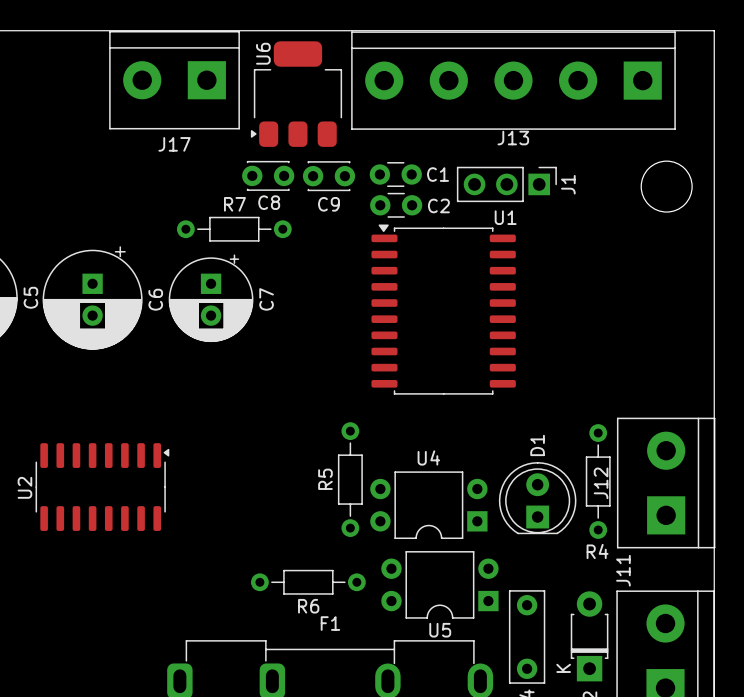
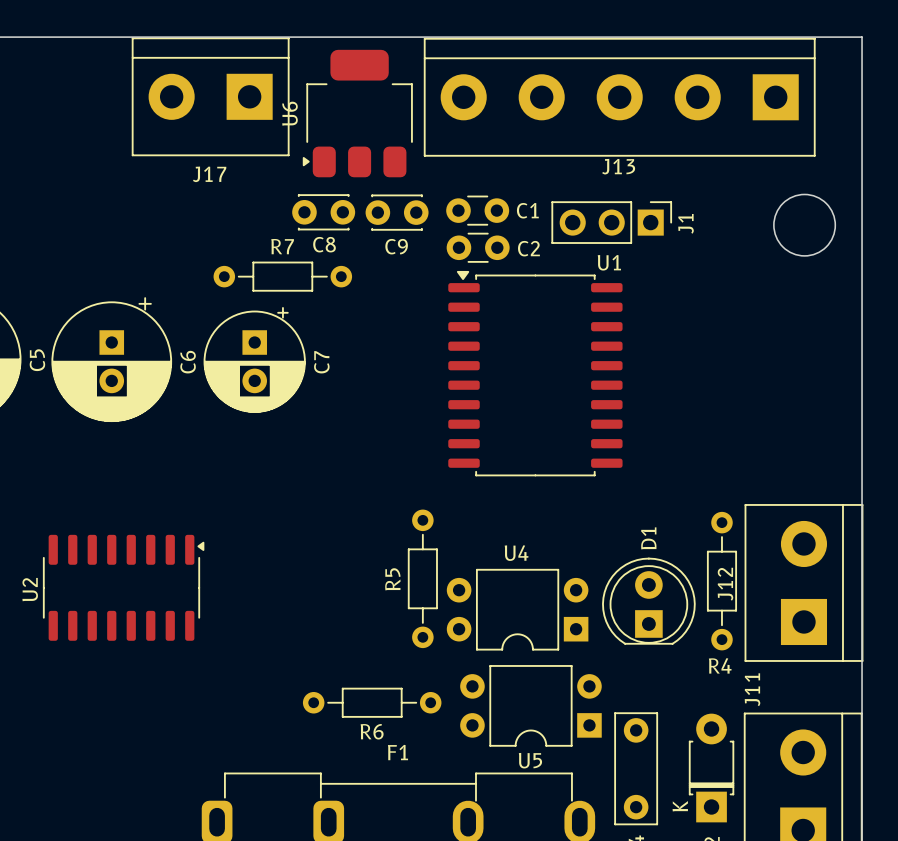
U6 name position: U6 (263, 53) -> U6 (290, 113)

